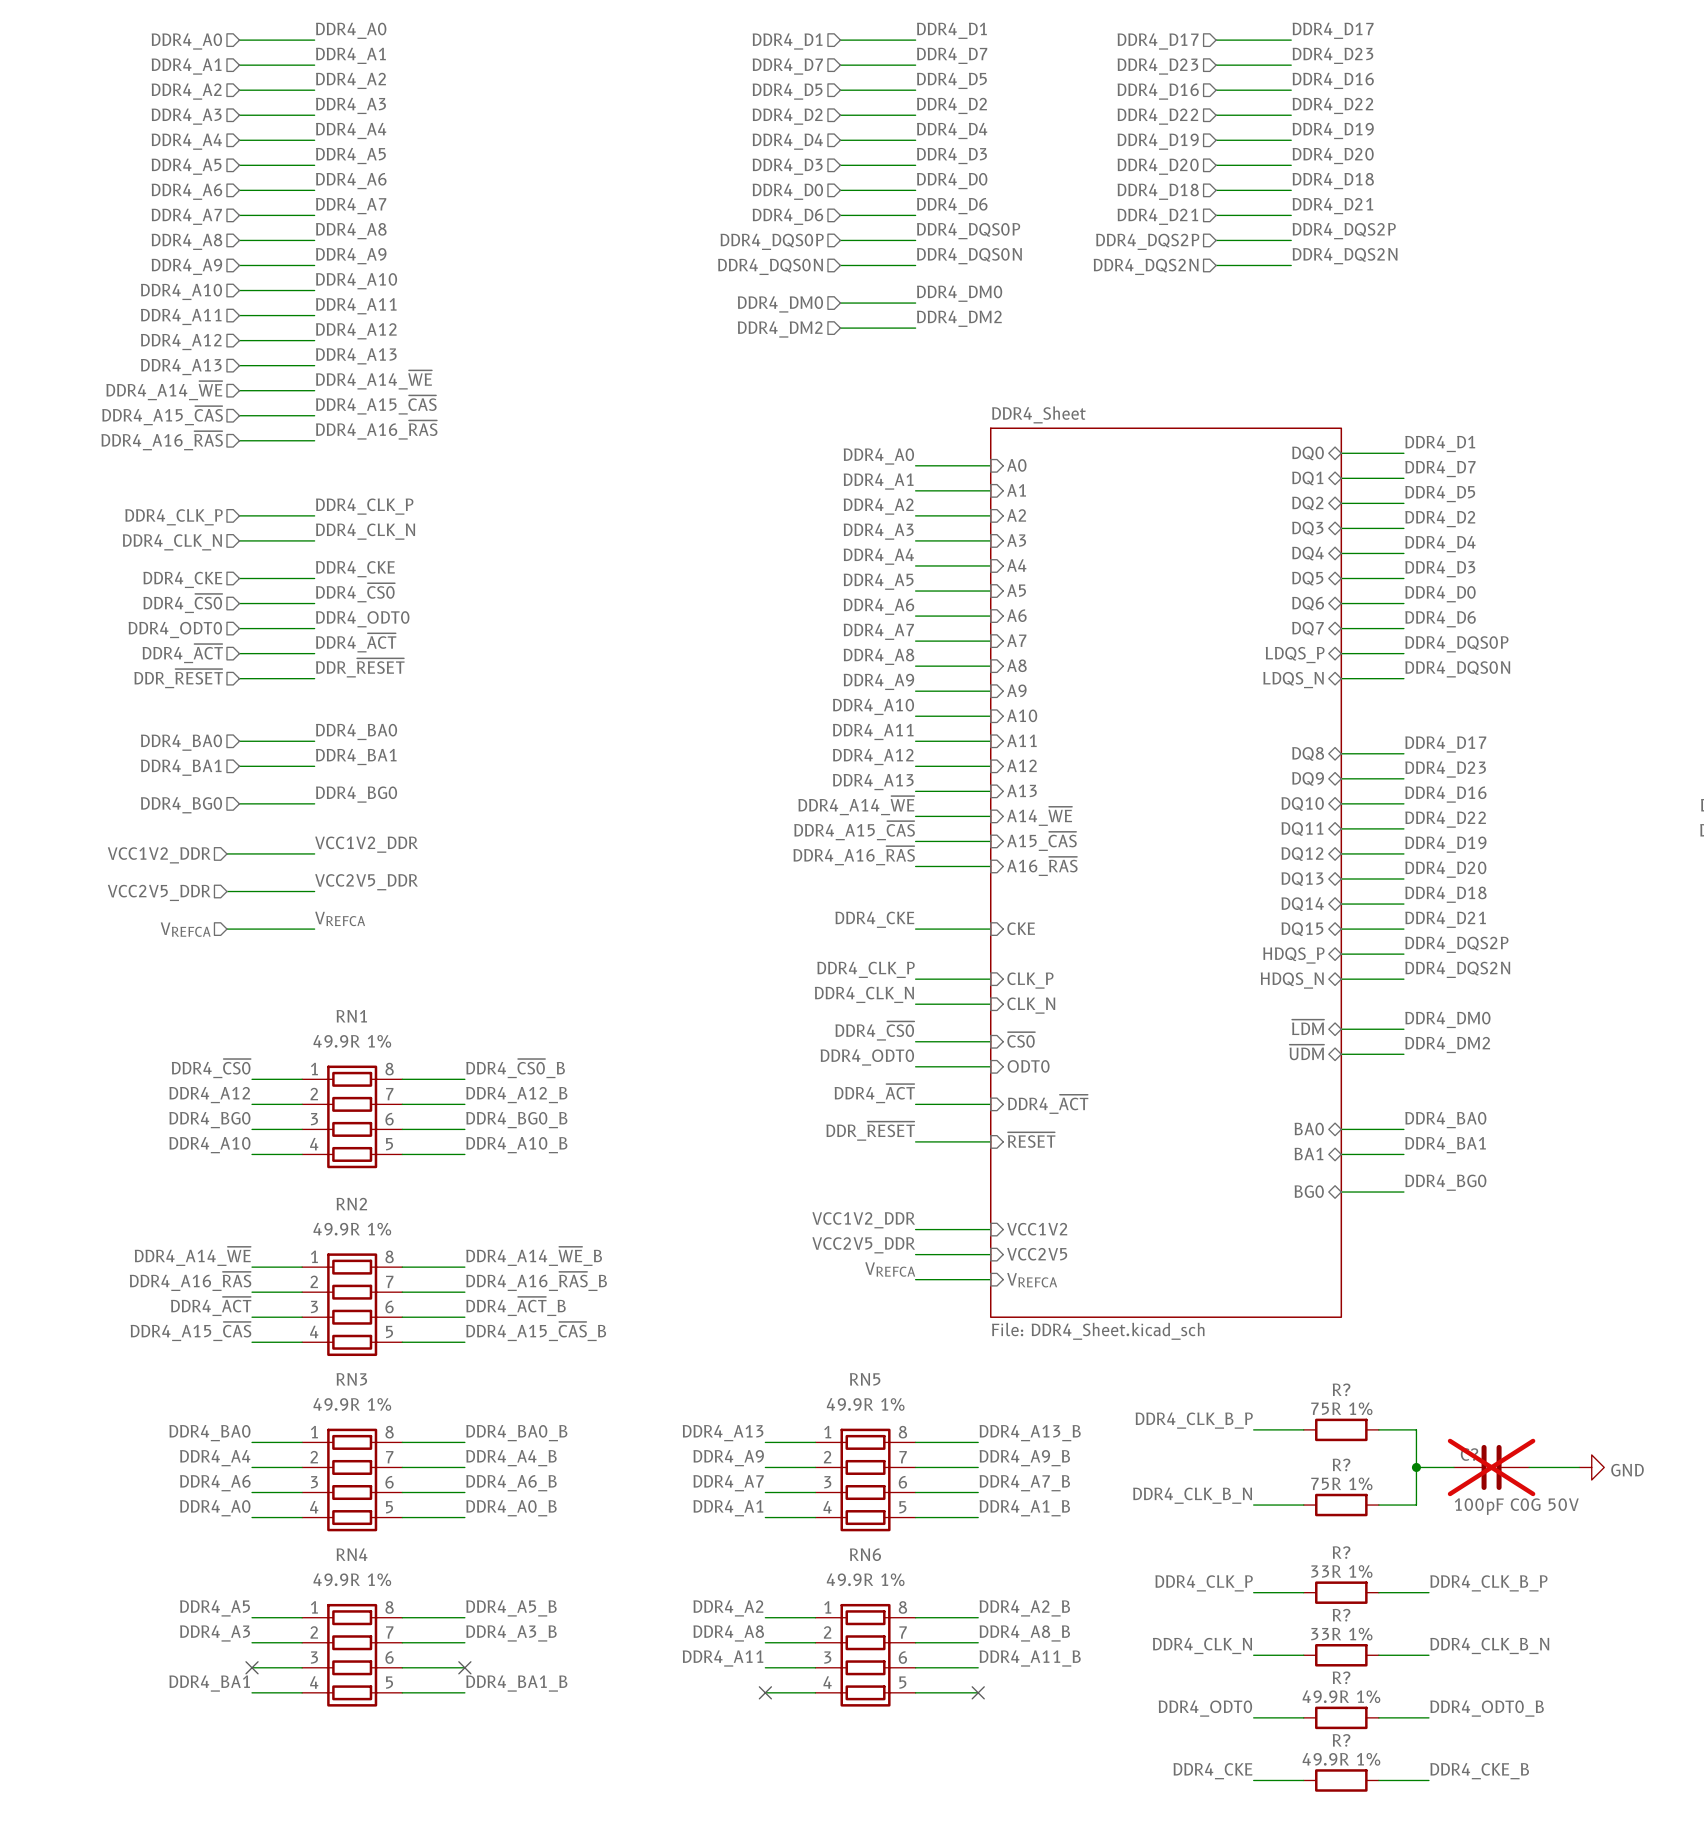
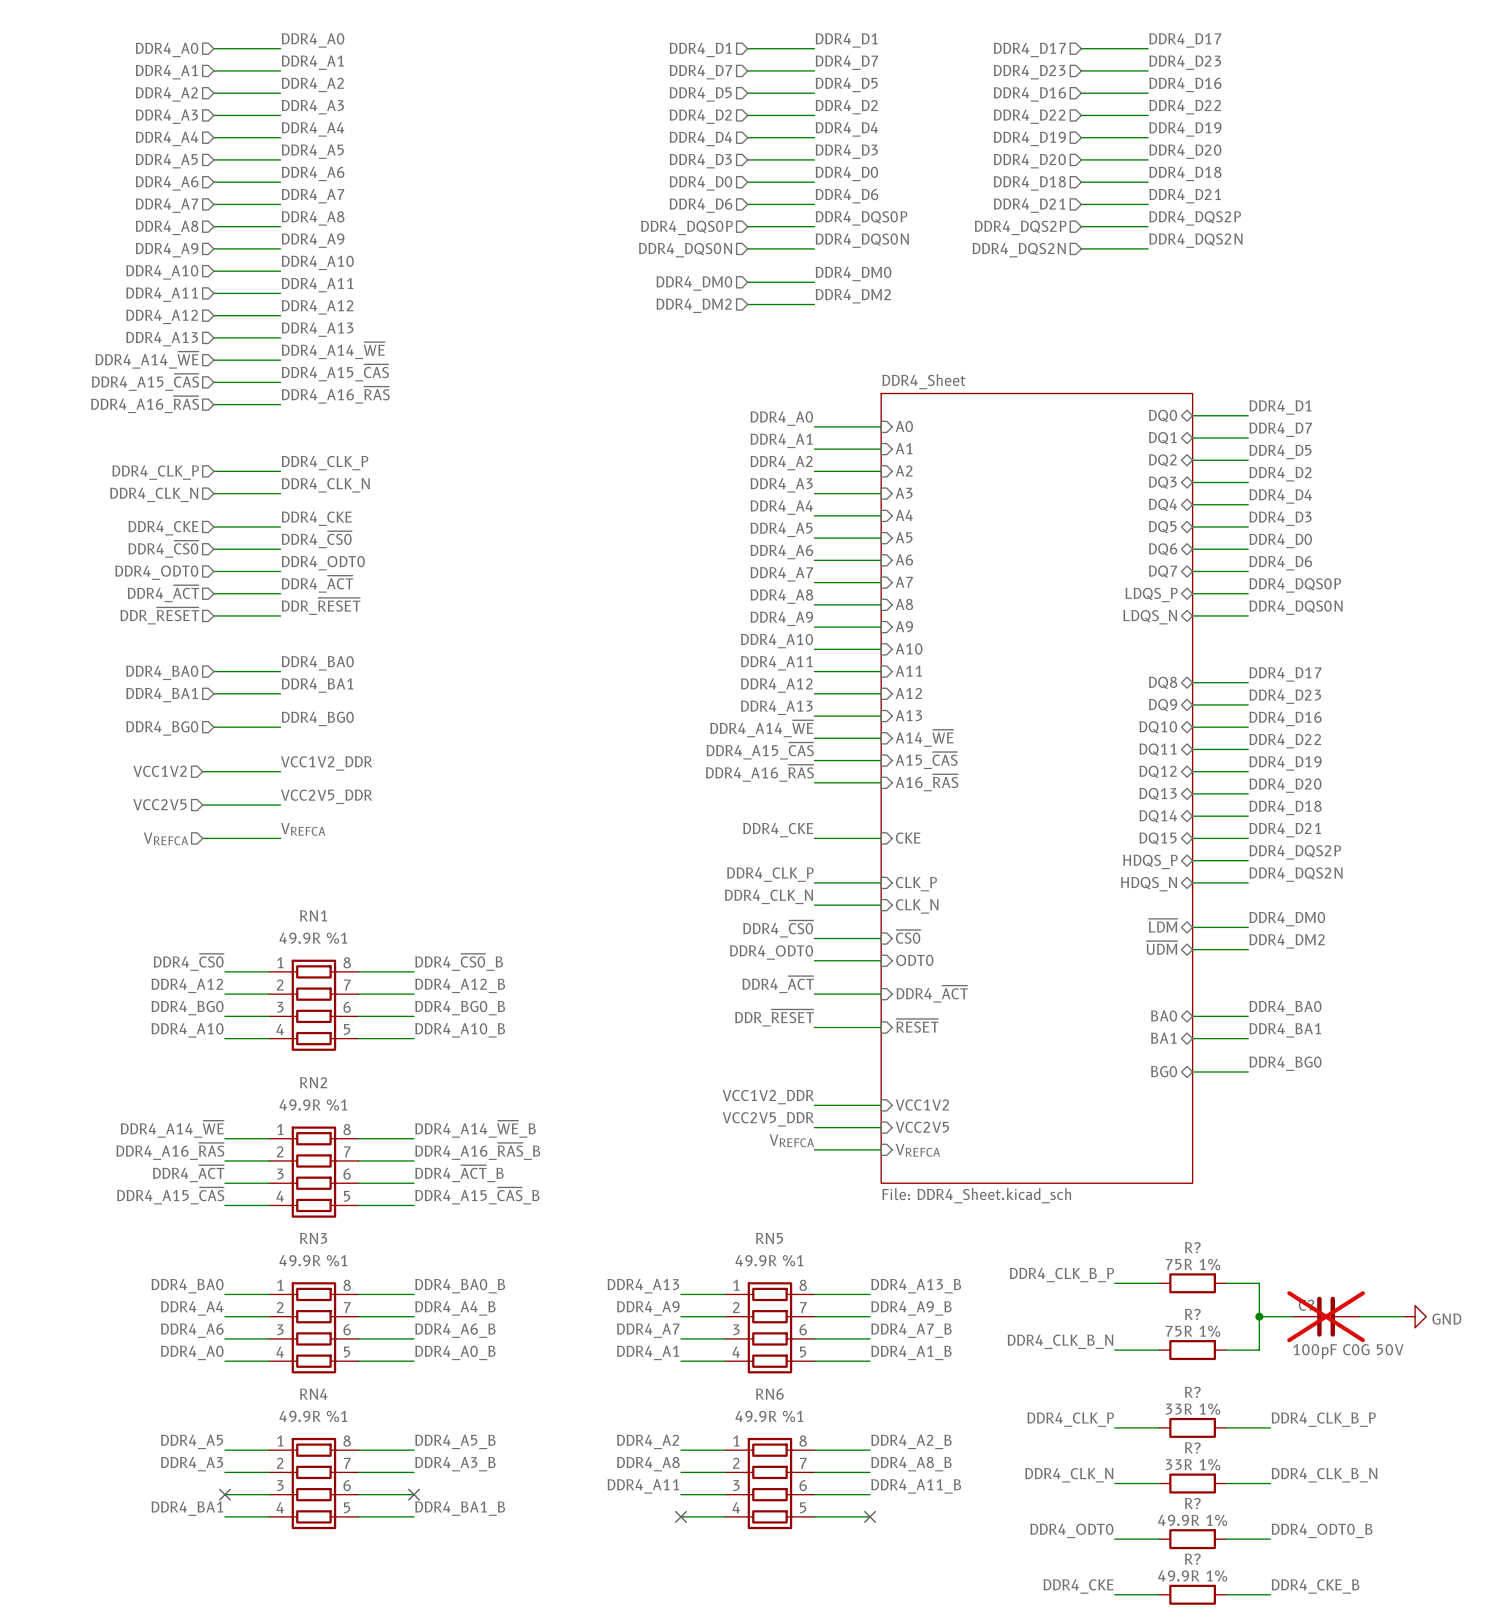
hierarchical label: VCC1V2_DDR (159, 855) -> VCC1V2 (160, 771)
hierarchical label: VCC2V5_DDR (159, 892) -> VCC2V5 (160, 804)
RN1 value: 49.9R 1% (352, 1041) -> 49.9R %1 (313, 938)
RN2 value: 49.9R 1% (352, 1229) -> 49.9R %1 (313, 1105)
RN3 value: 49.9R 1% (352, 1404) -> 49.9R %1 (313, 1260)
RN5 value: 49.9R 1% (865, 1404) -> 49.9R %1 (769, 1260)
RN4 value: 49.9R 1% (352, 1579) -> 49.9R %1 (313, 1416)
RN6 value: 49.9R 1% (865, 1579) -> 49.9R %1 (769, 1416)

